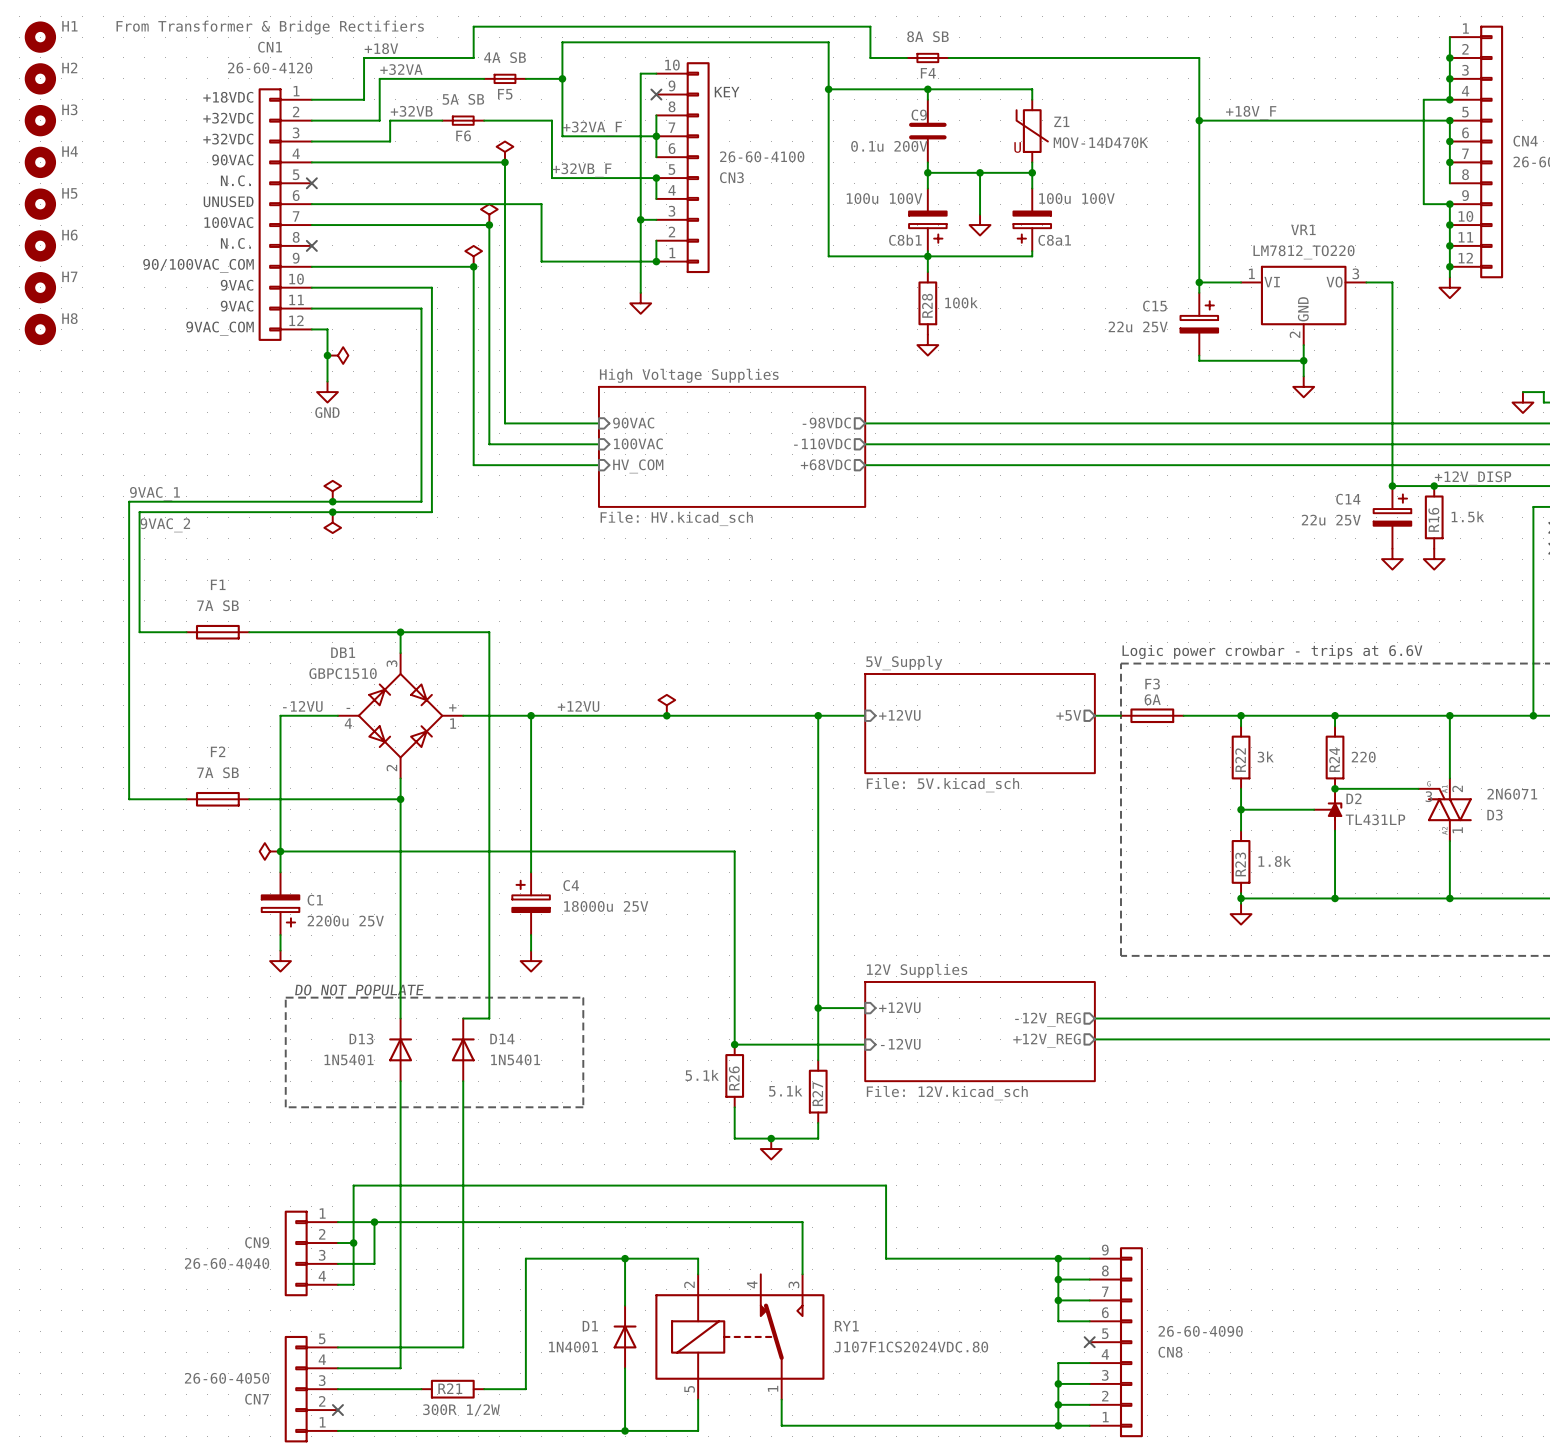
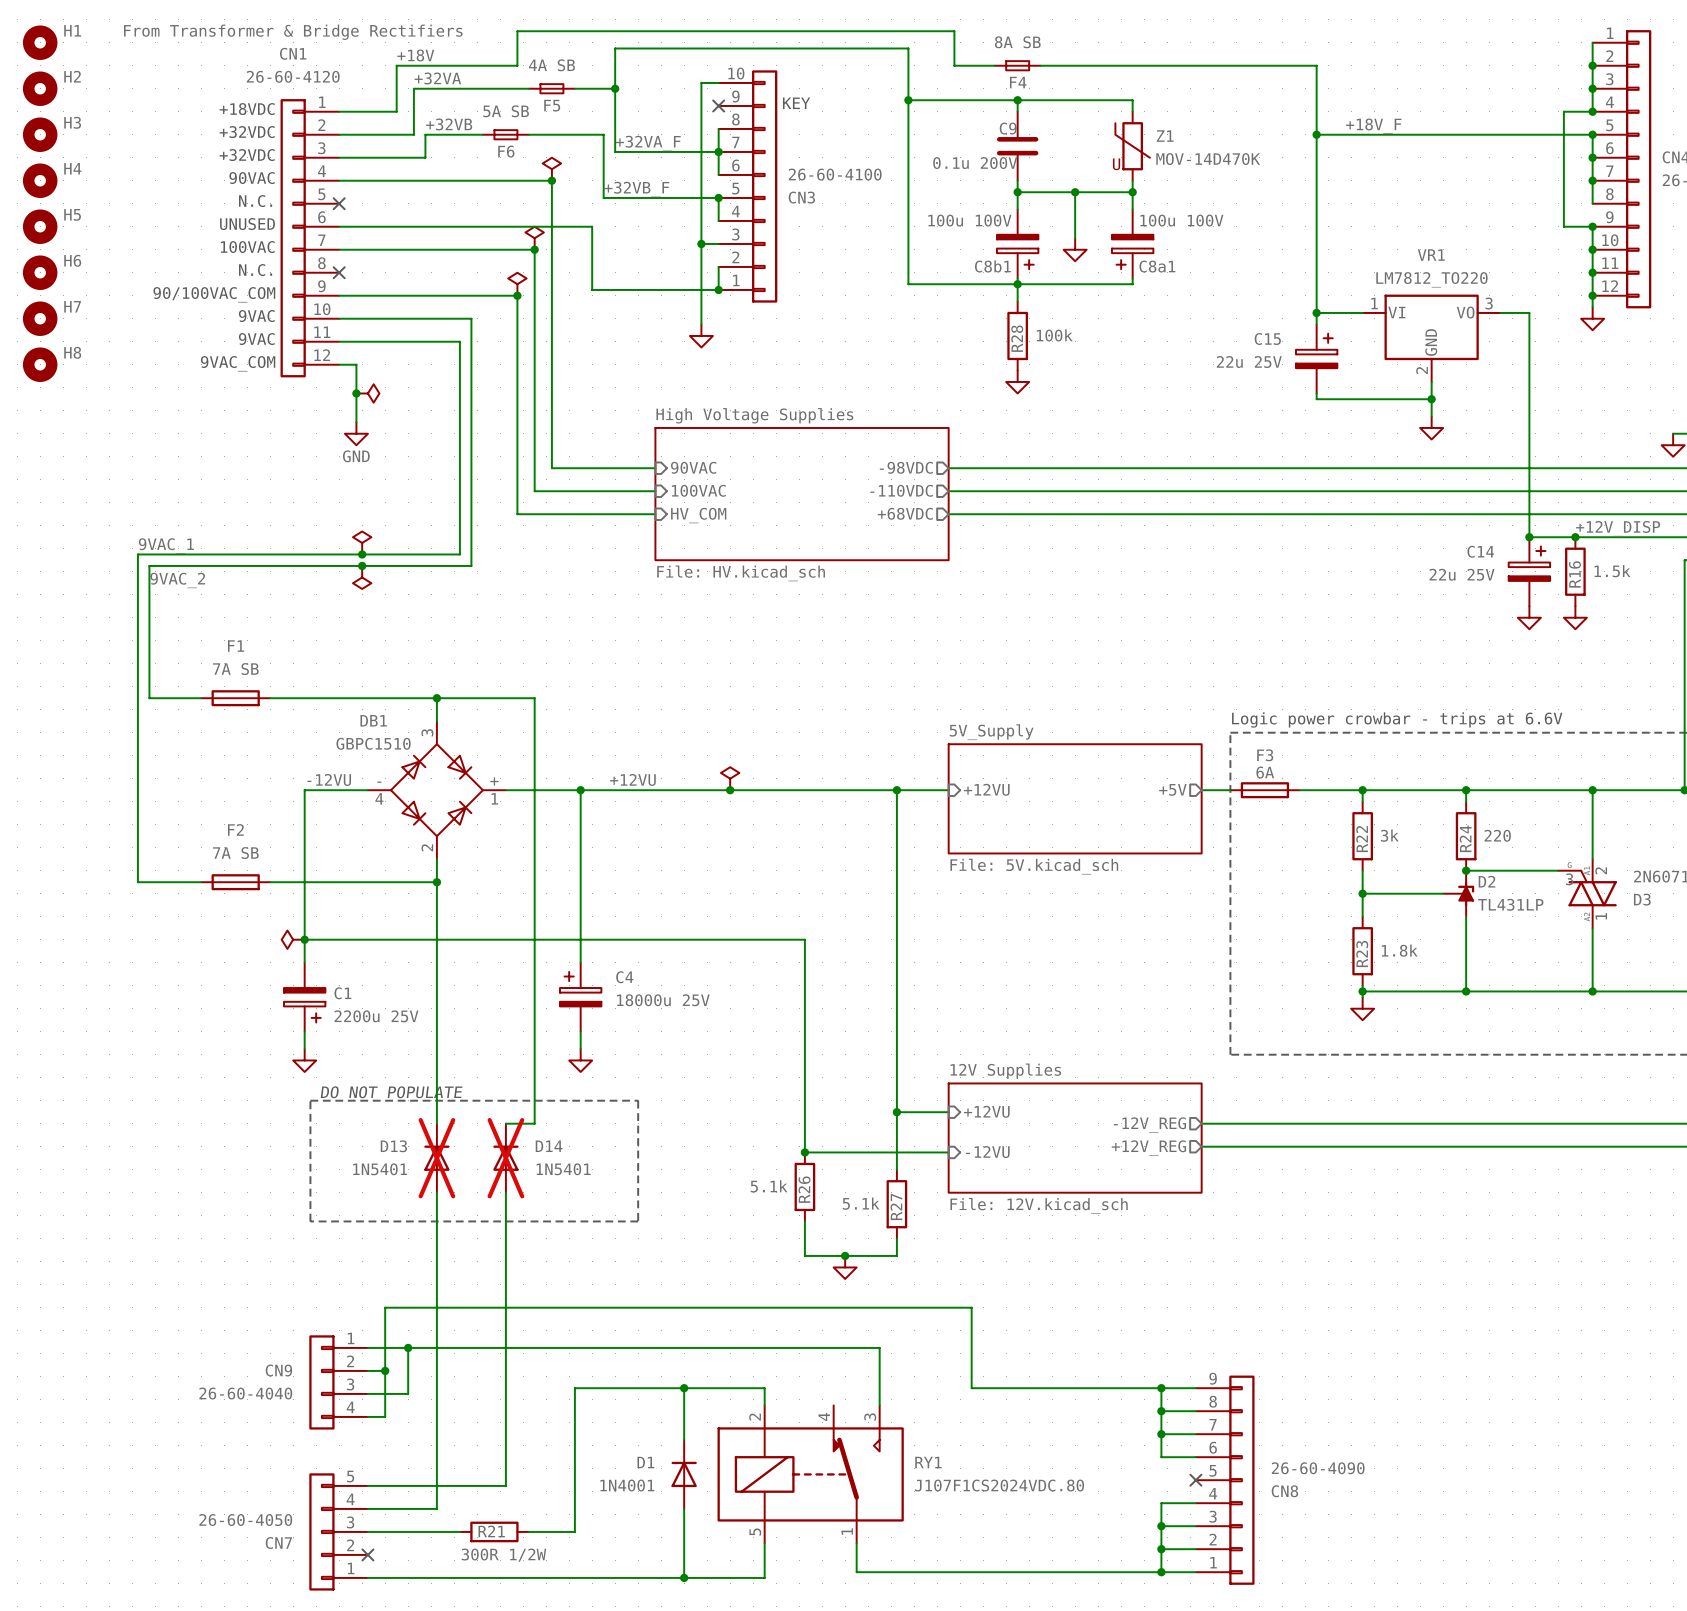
D13 do-not-place cross: none -> (436, 1158)
D14 do-not-place cross: none -> (505, 1158)

